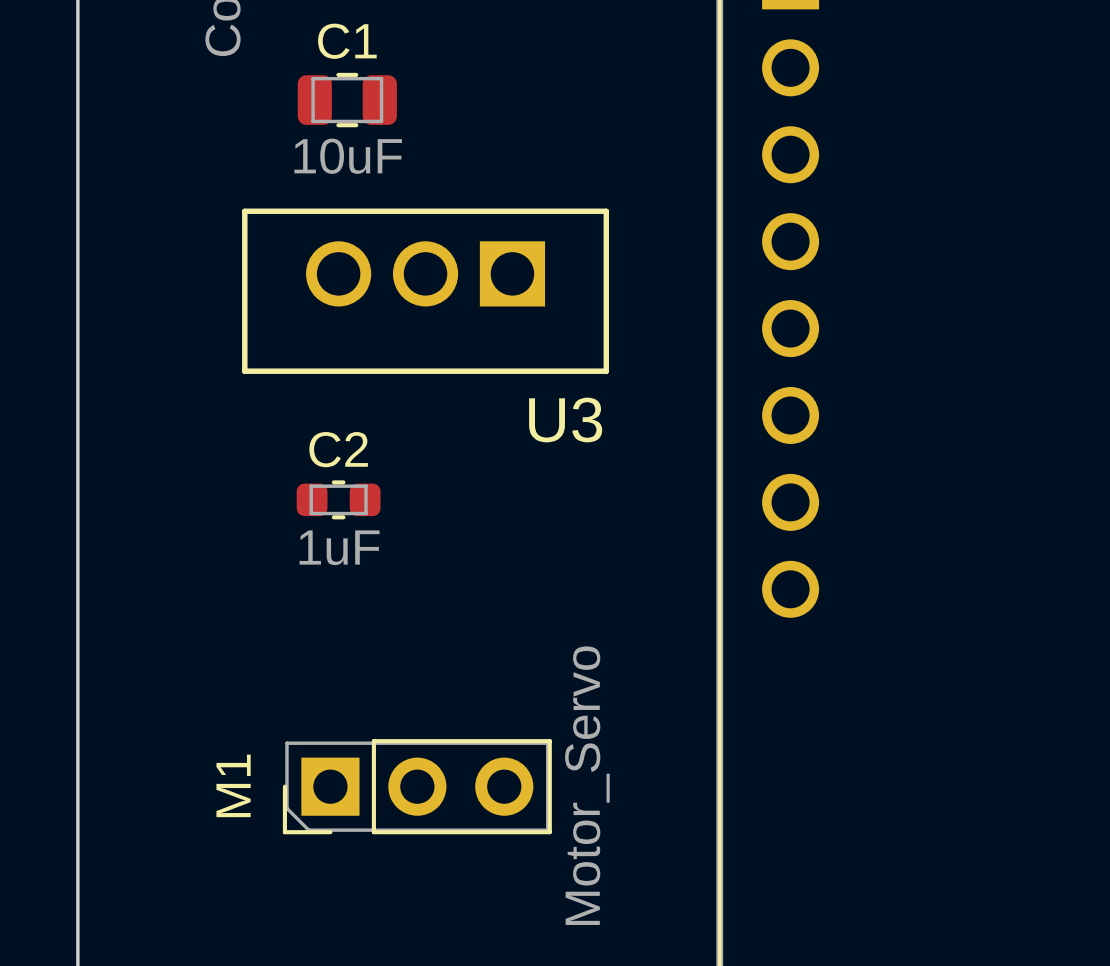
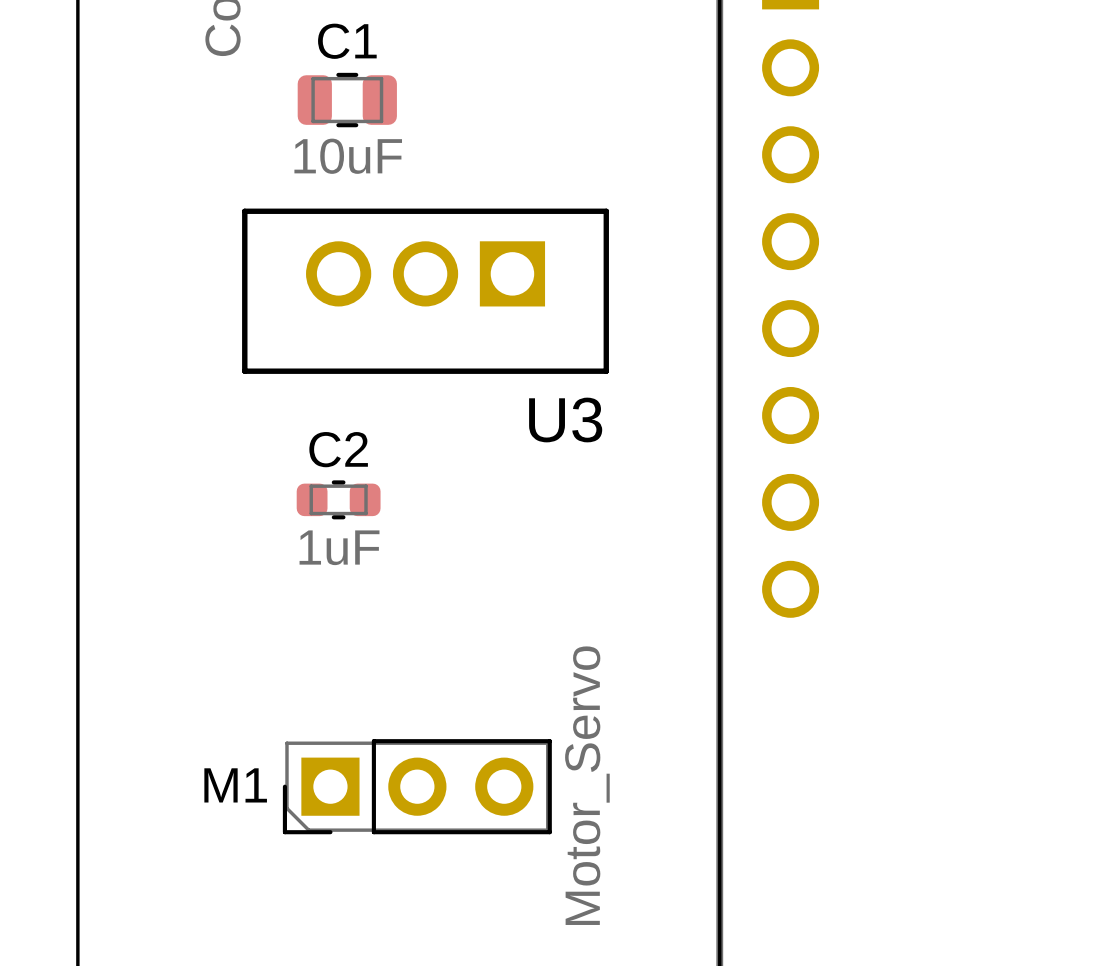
M1 name rotation: 0° (233, 785) -> 90° clockwise (235, 785)

